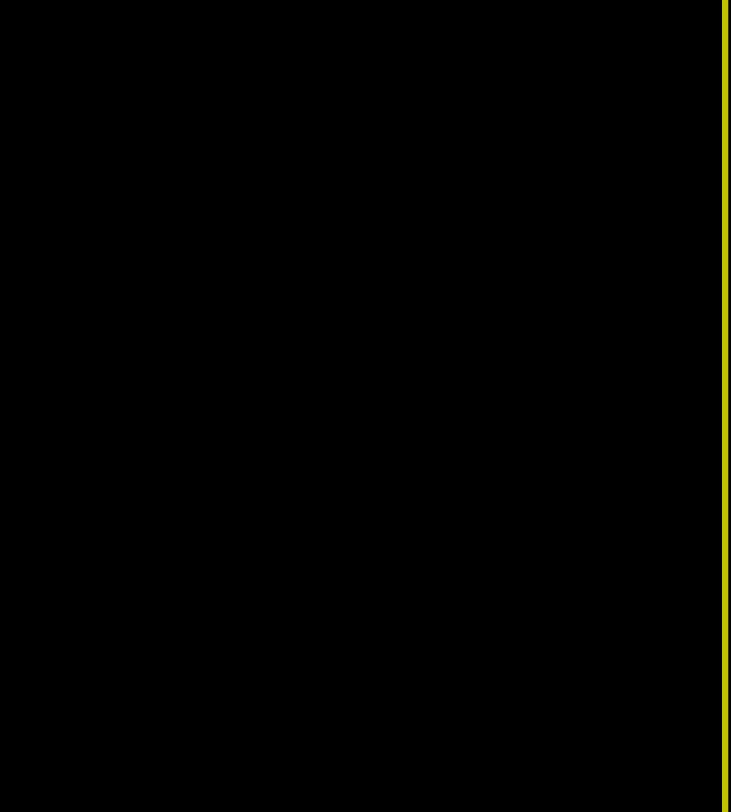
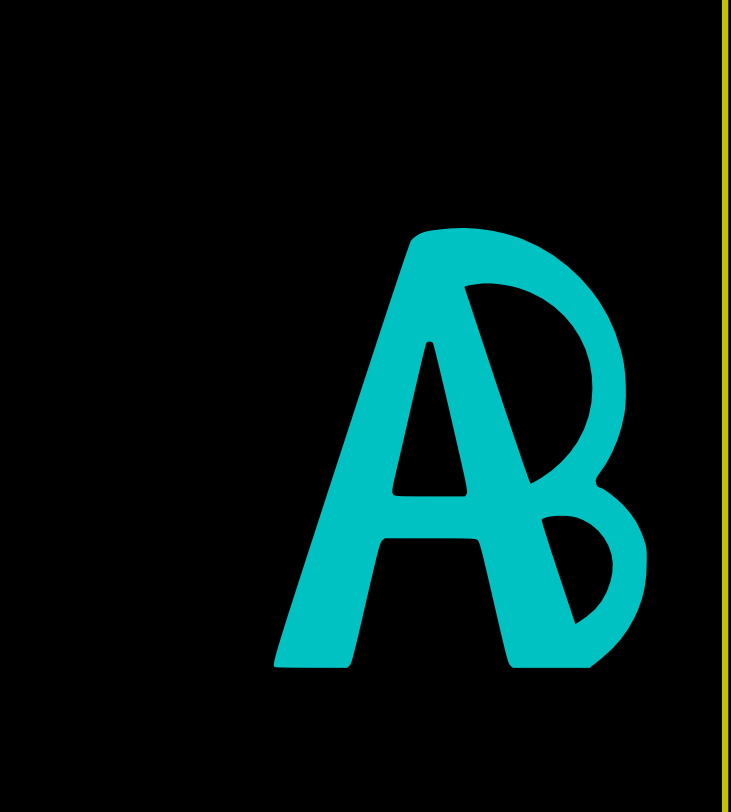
drawing: none -> [273, 227, 647, 668]

